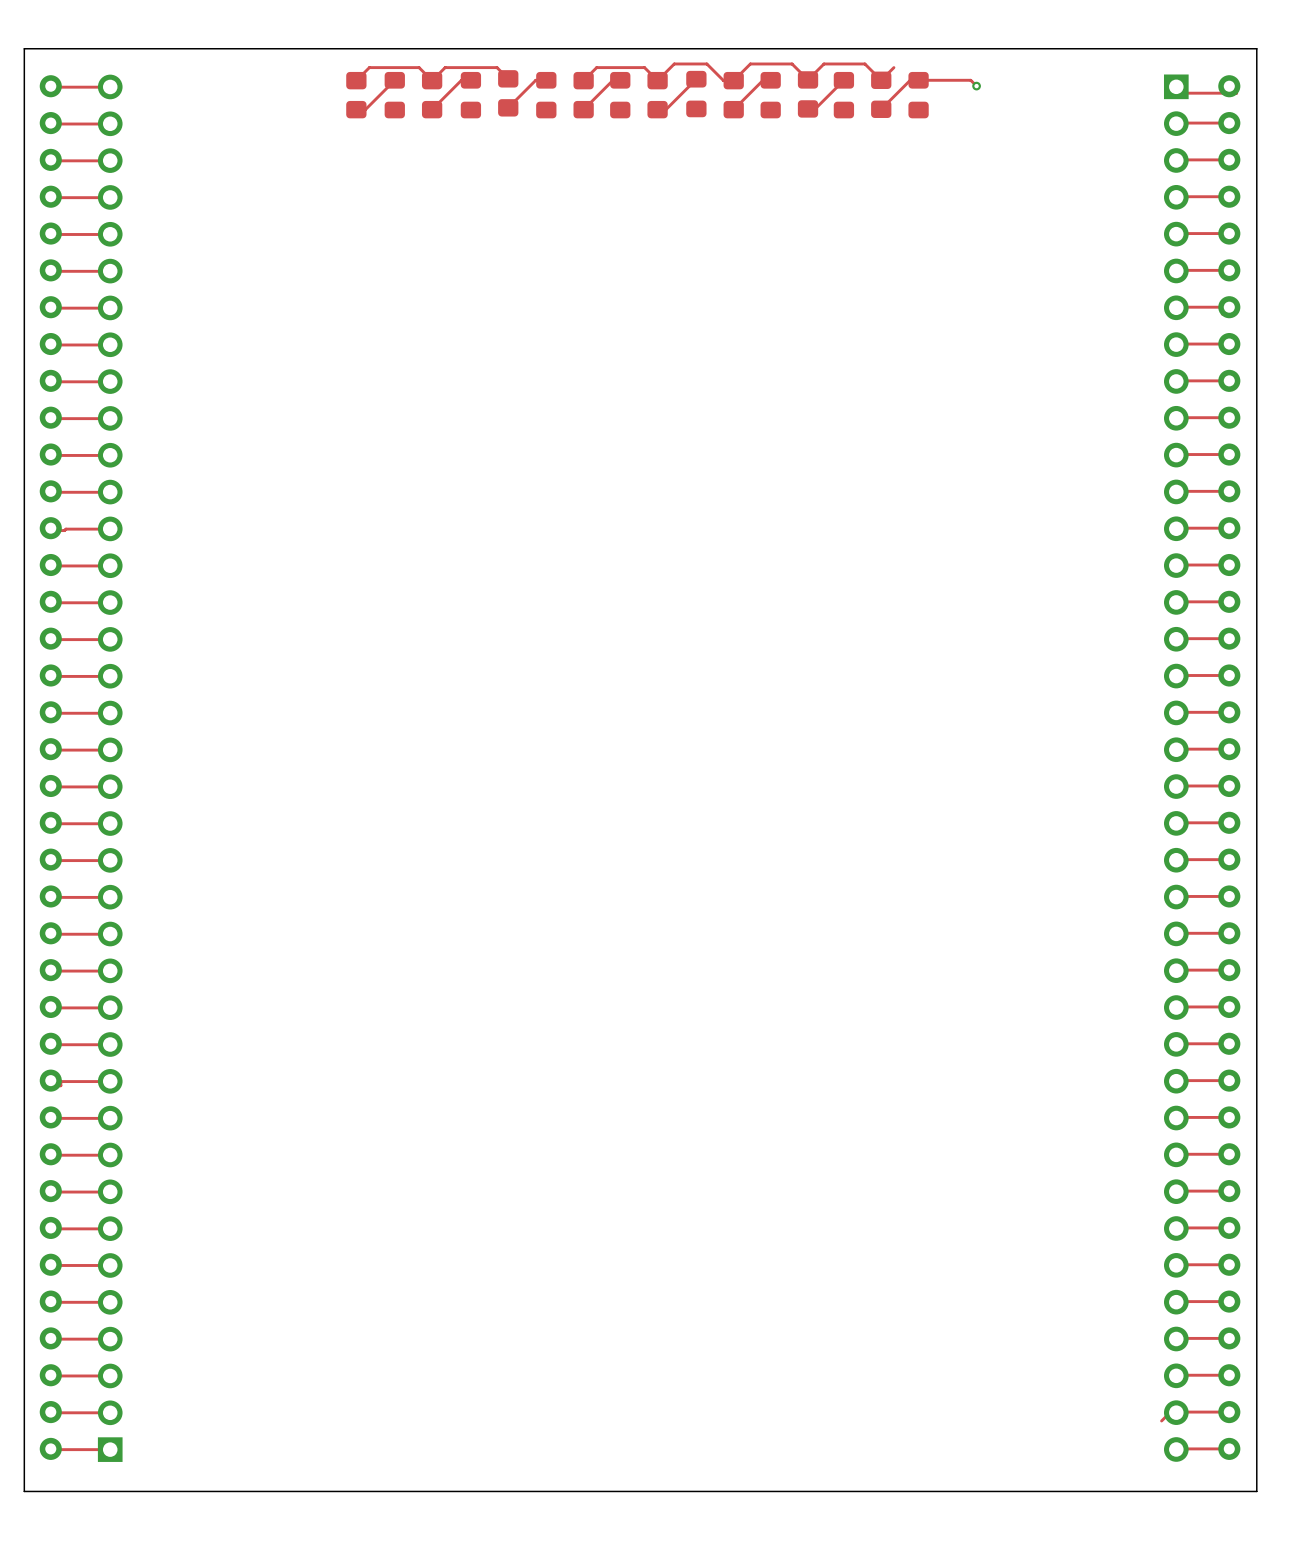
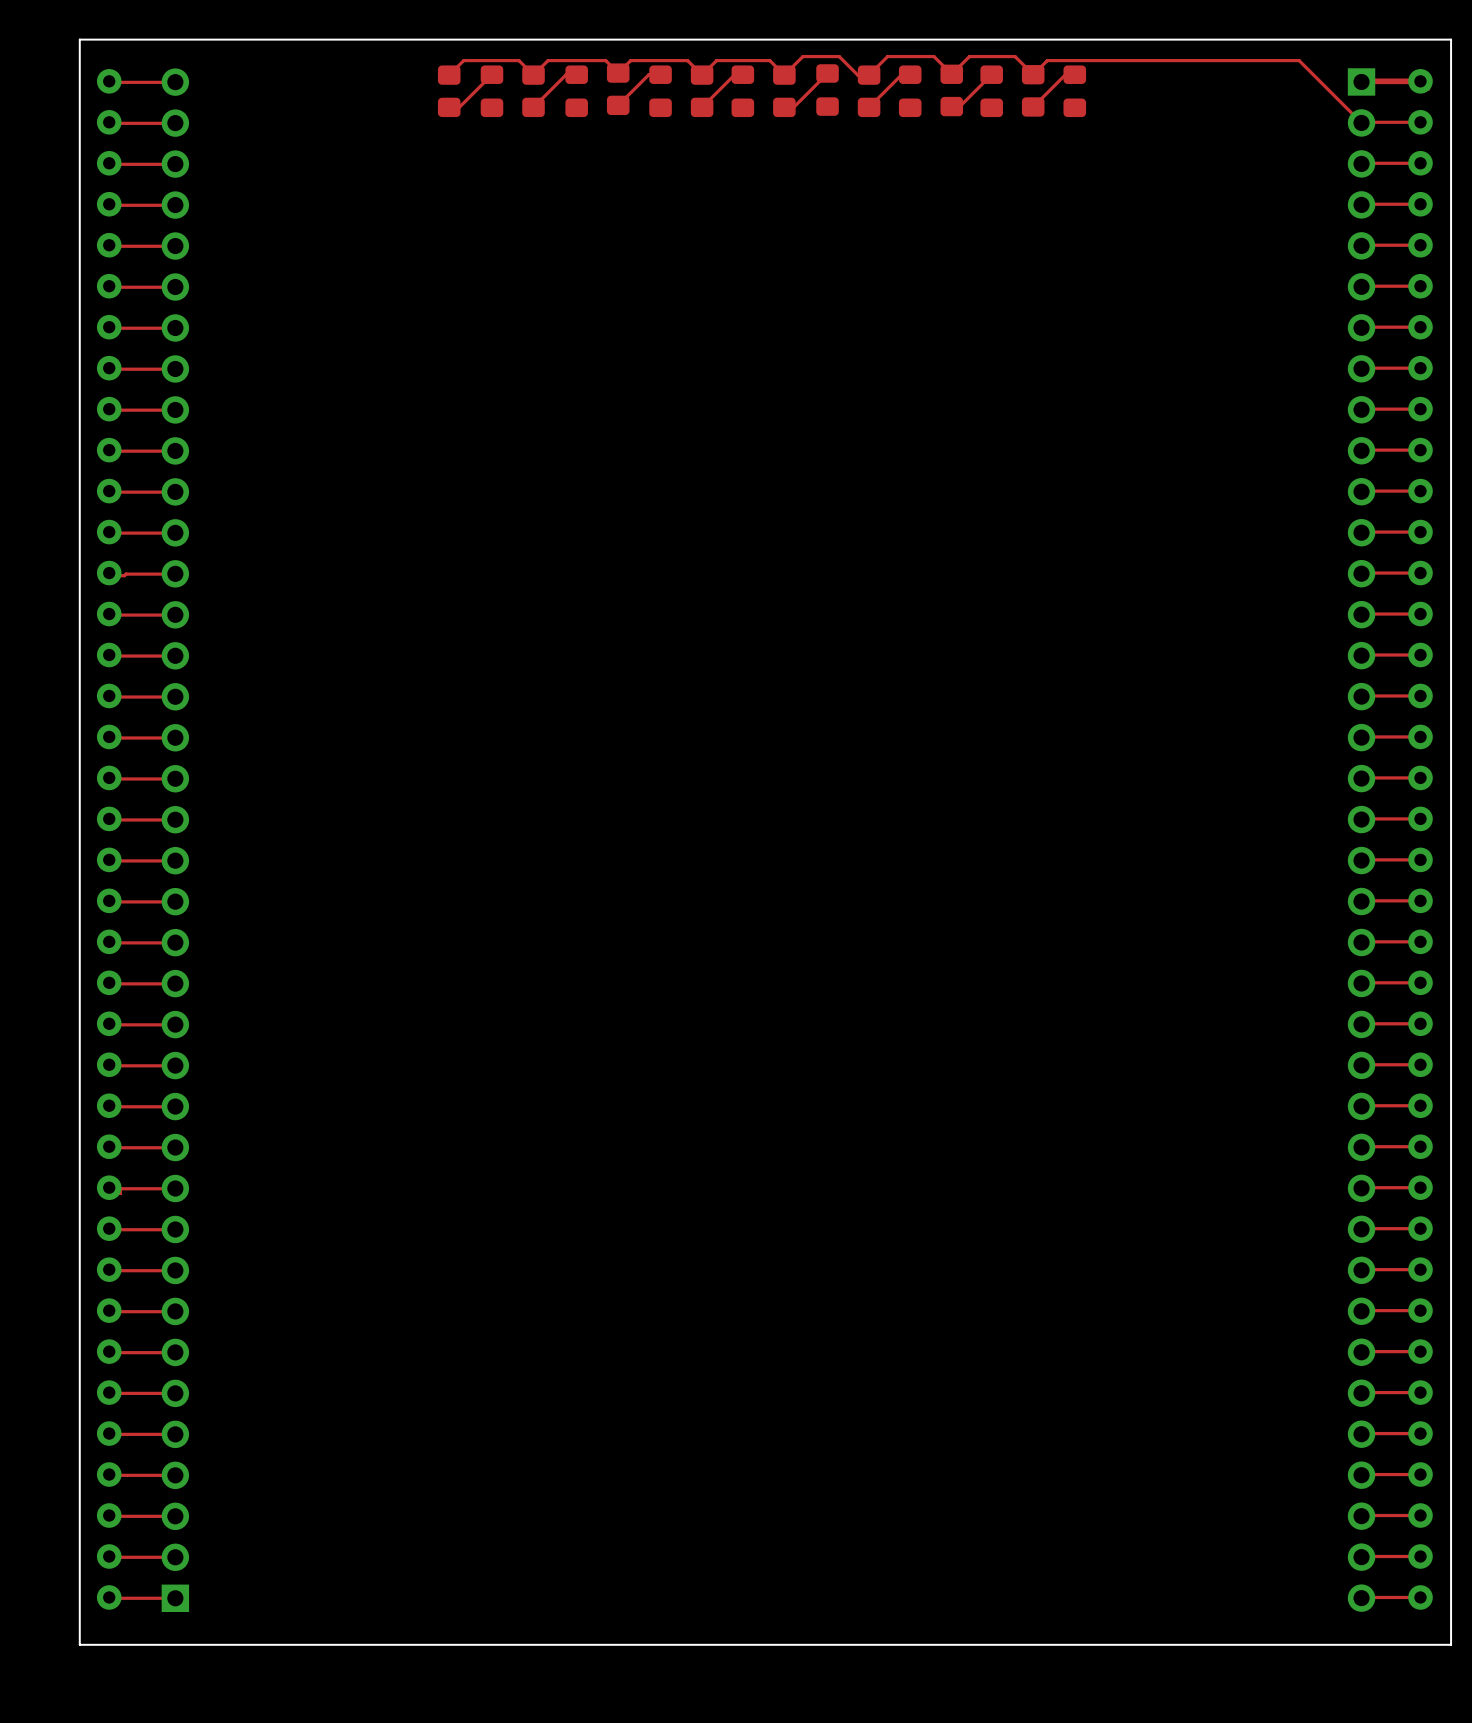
top track: none -> (1047, 60) (1299, 60) (1361, 122)
top track: none -> (618, 73) (630, 60) (687, 60) (702, 75)
top track: (918, 80) (970, 80) (976, 86) -> none
via: (976, 86) -> none
top track: none -> (1420, 81) (1361, 81)
top track: (1236, 93) (1175, 93) -> none
top track: (1166, 1416) (1161, 1420) -> none

